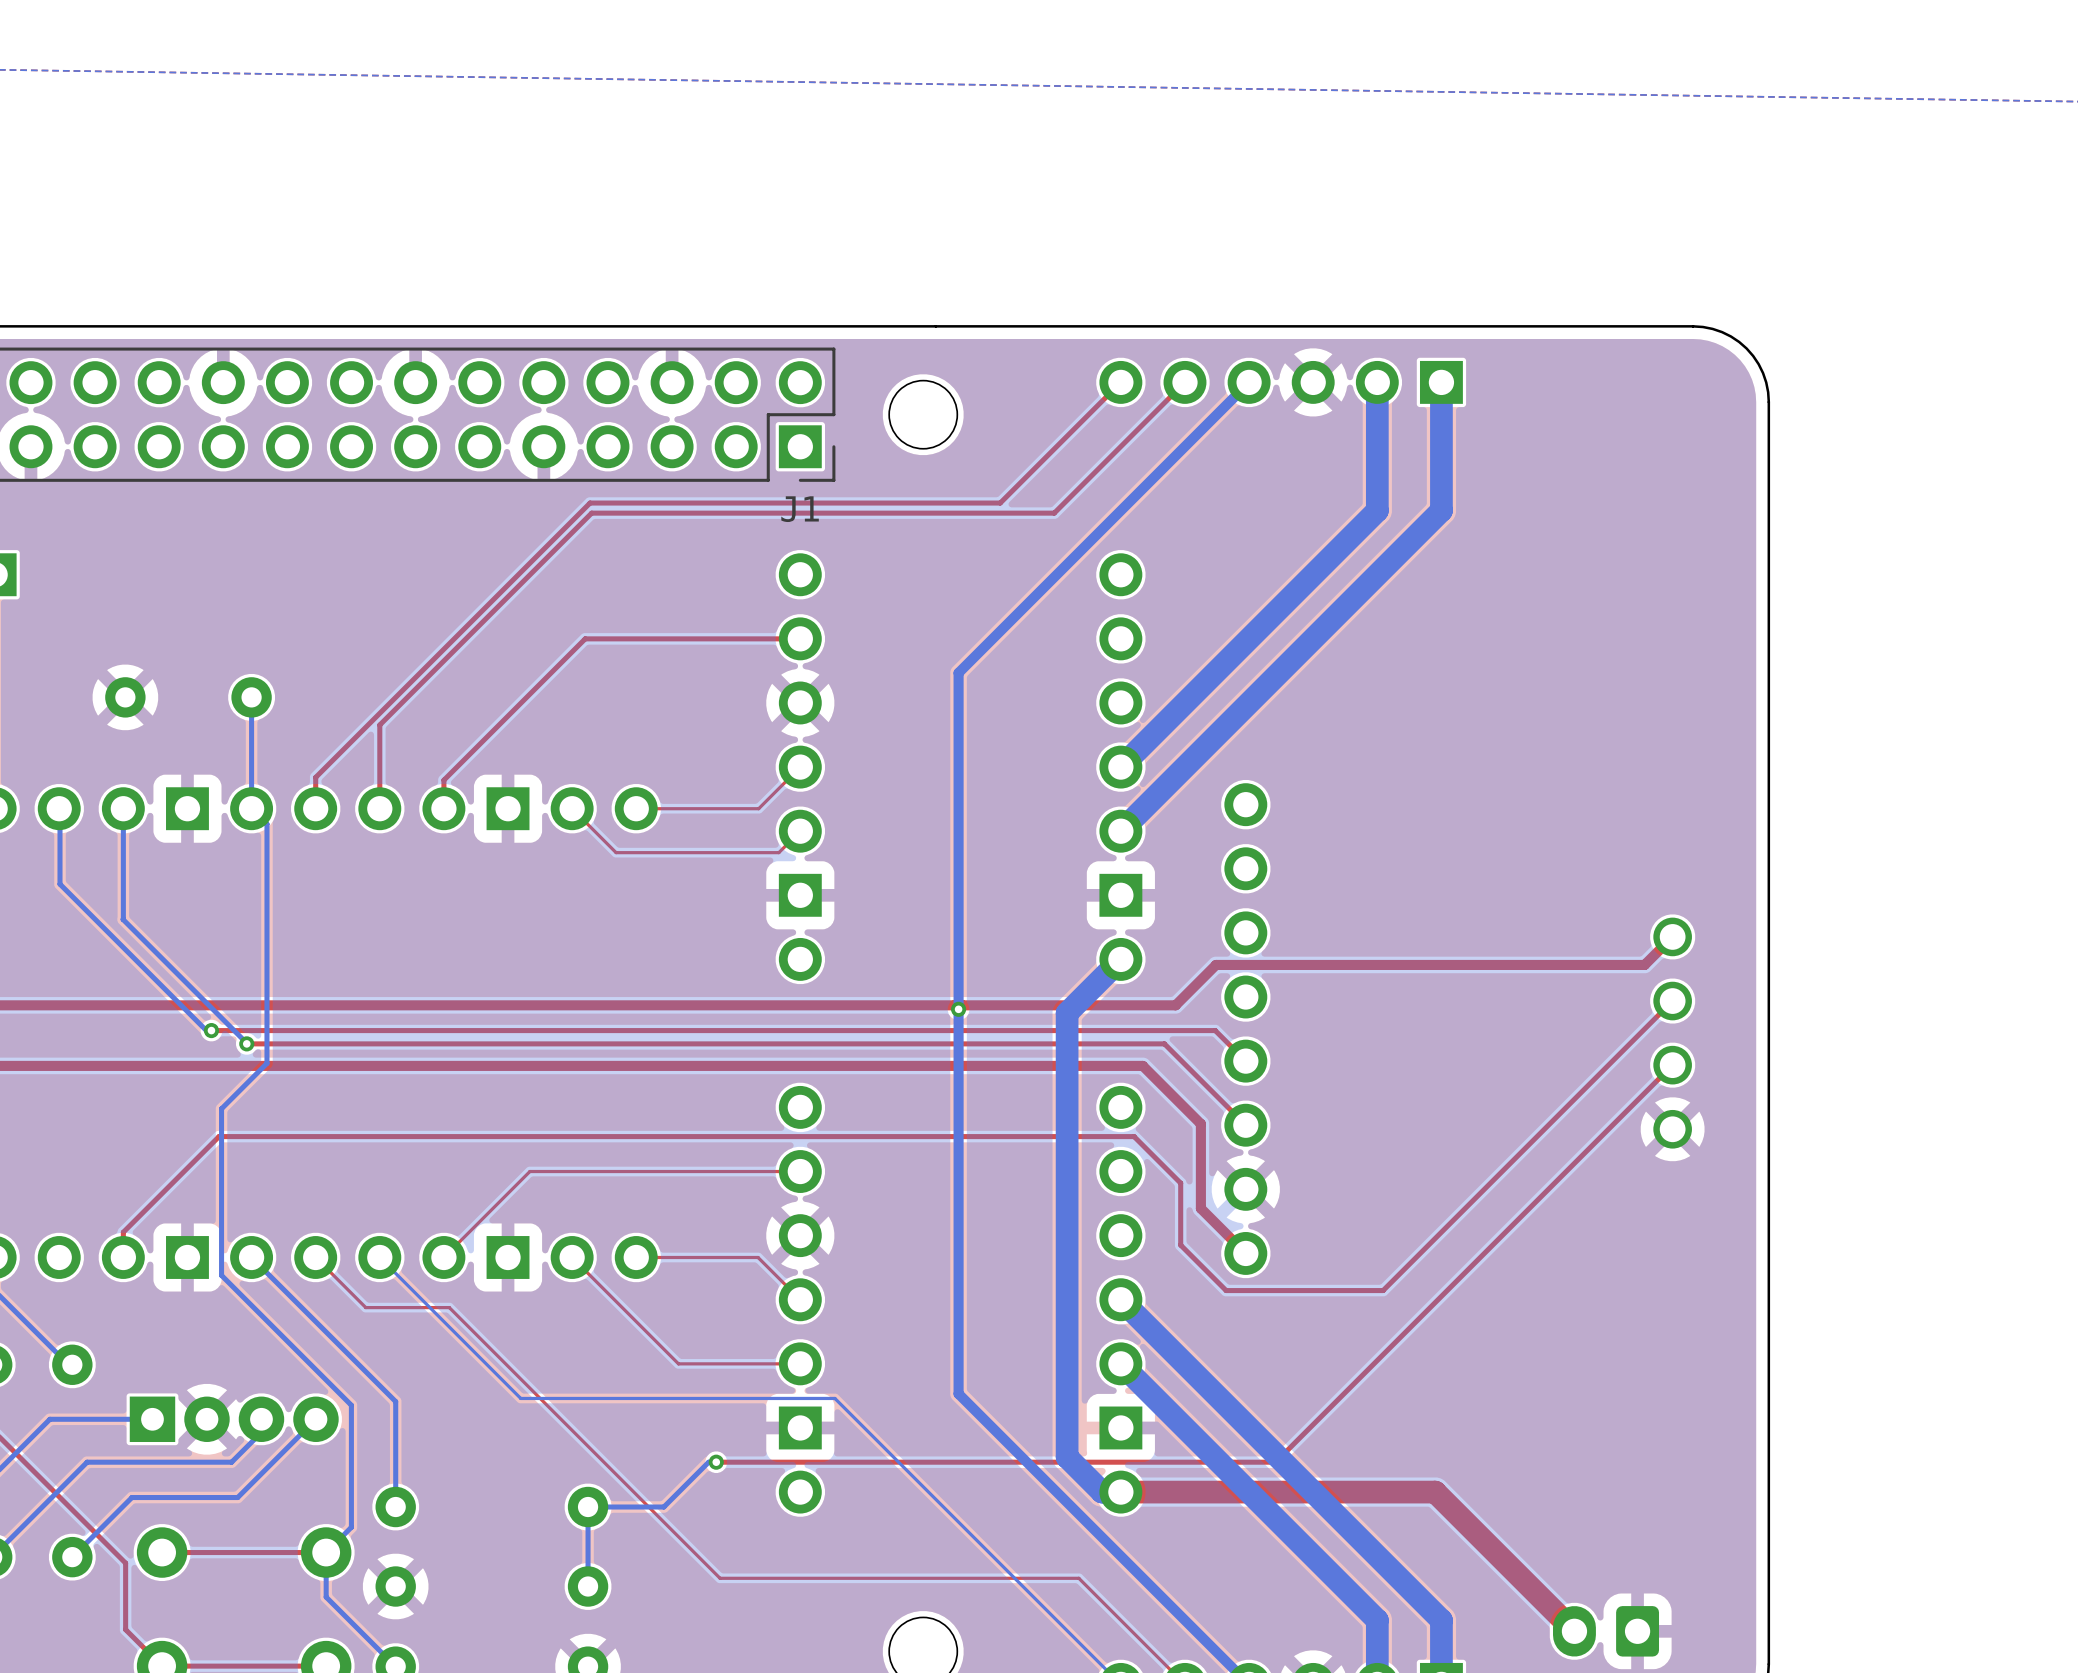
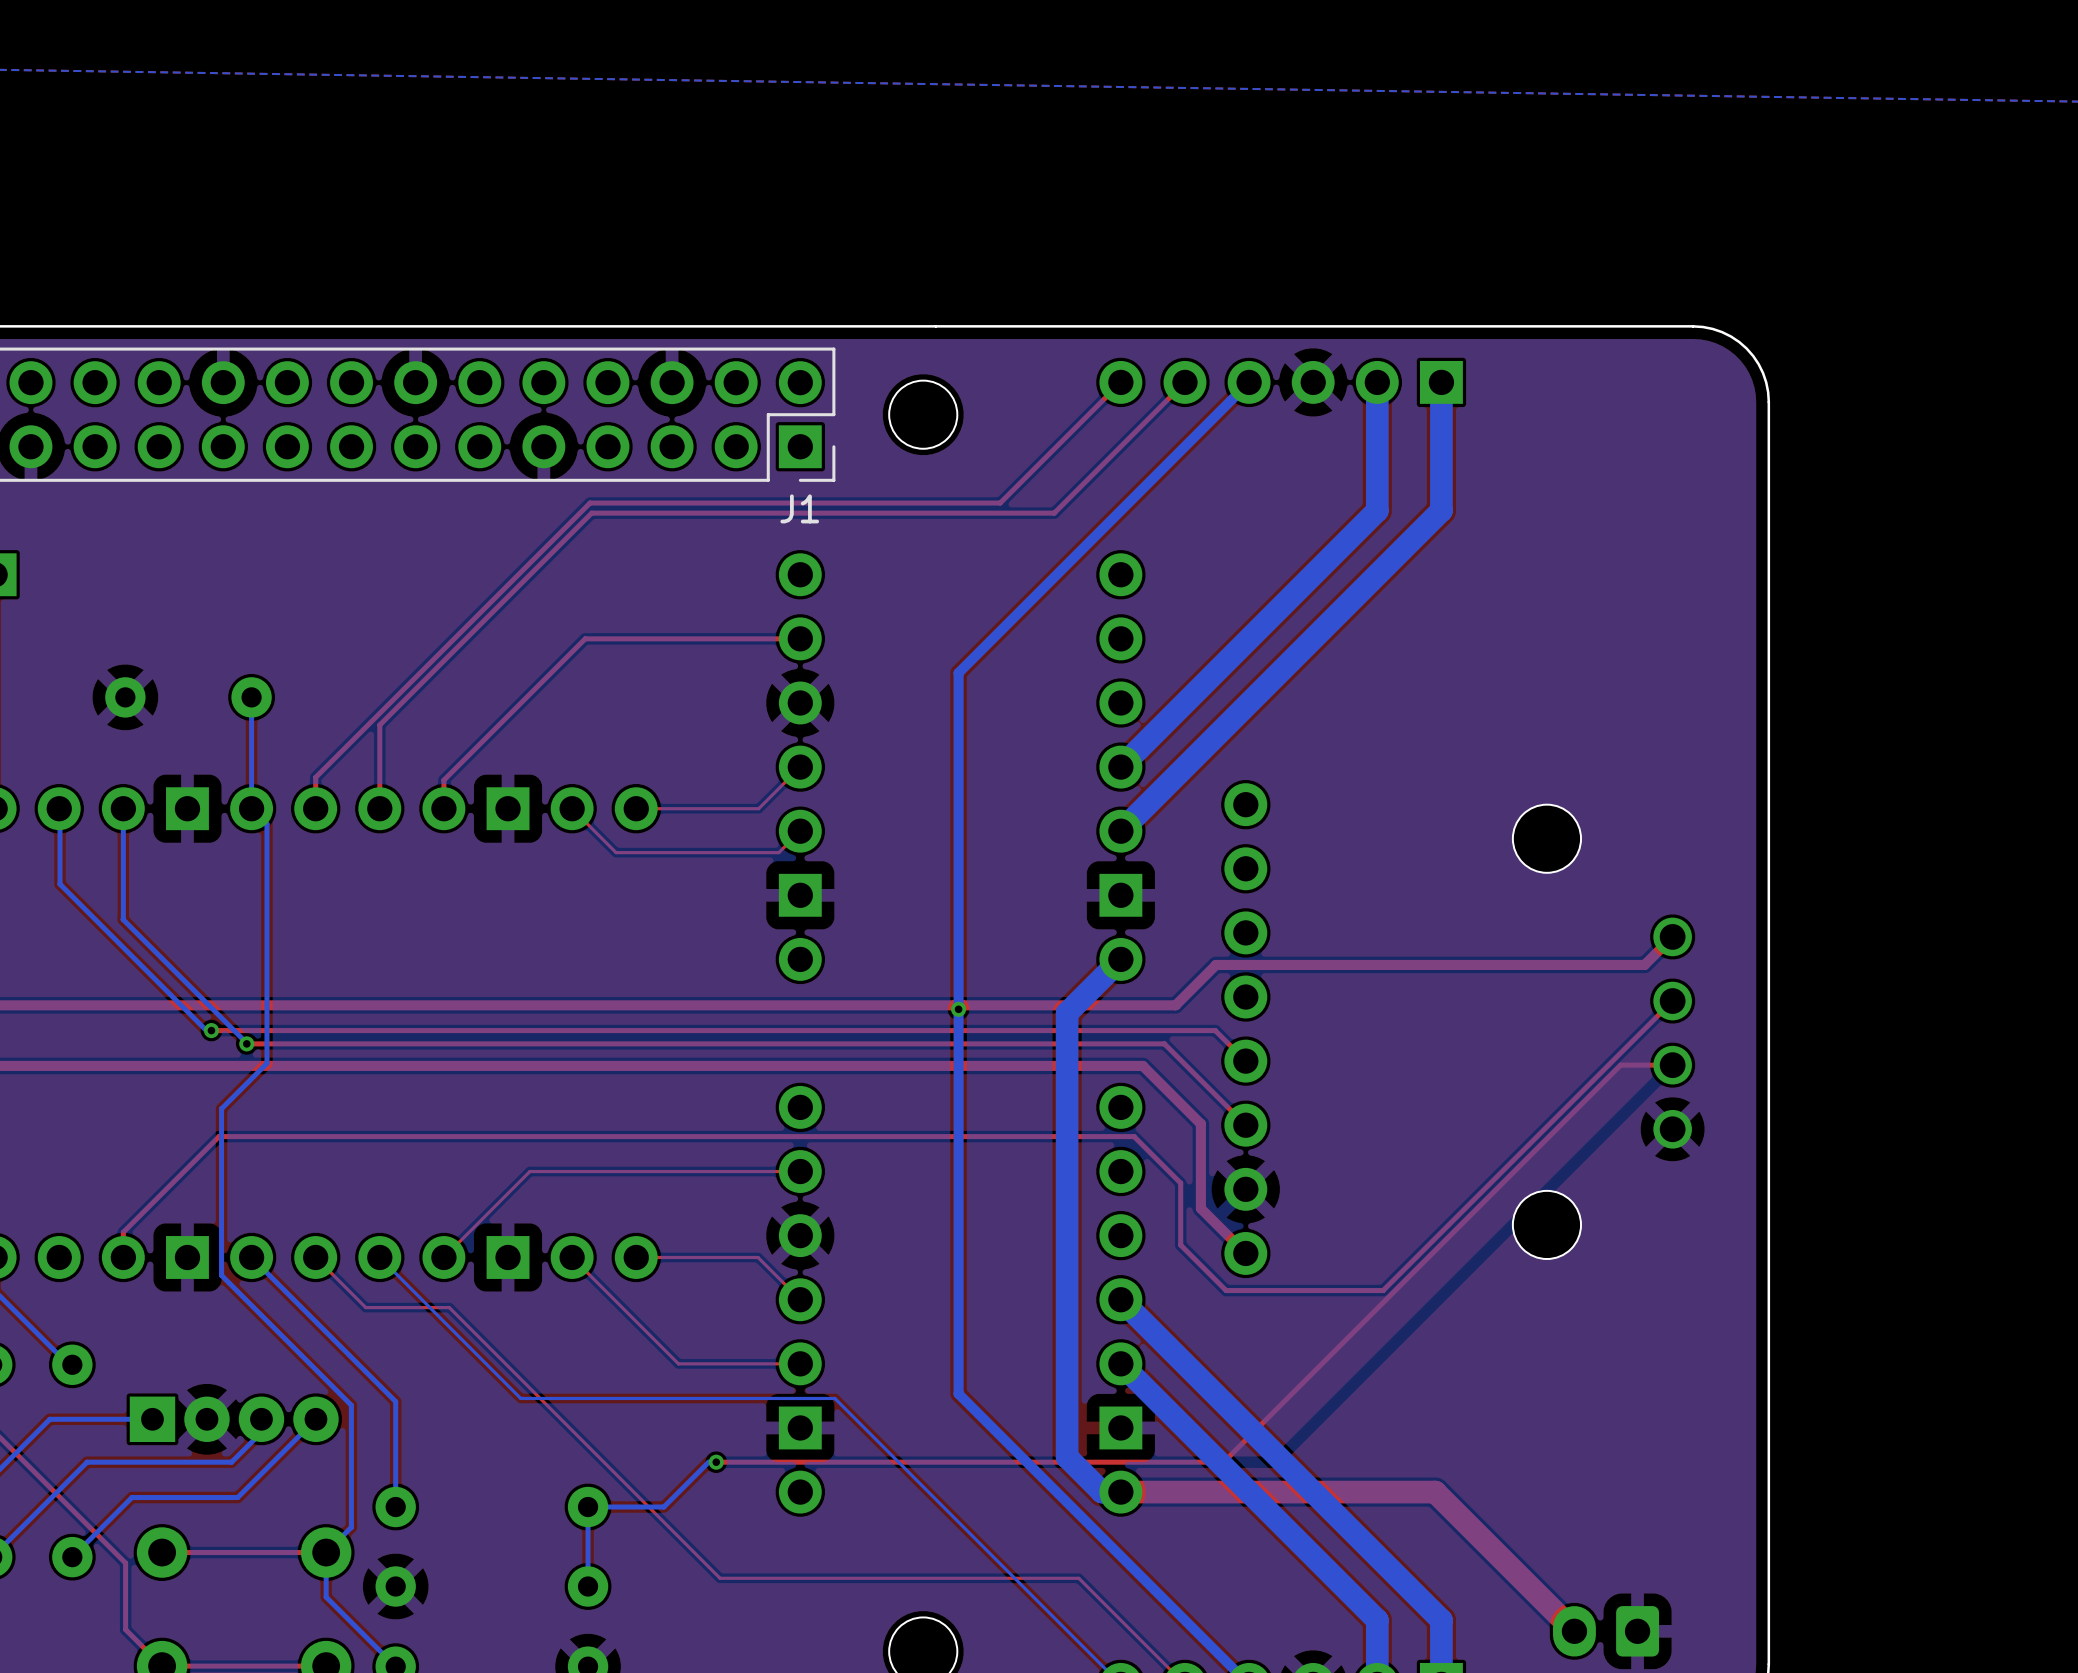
part: none -> (1546, 838)
top track: (1672, 1065) (1275, 1462) (1223, 1462) -> (1672, 1065) (1620, 1065) (1223, 1462)
part: none -> (1546, 1224)

